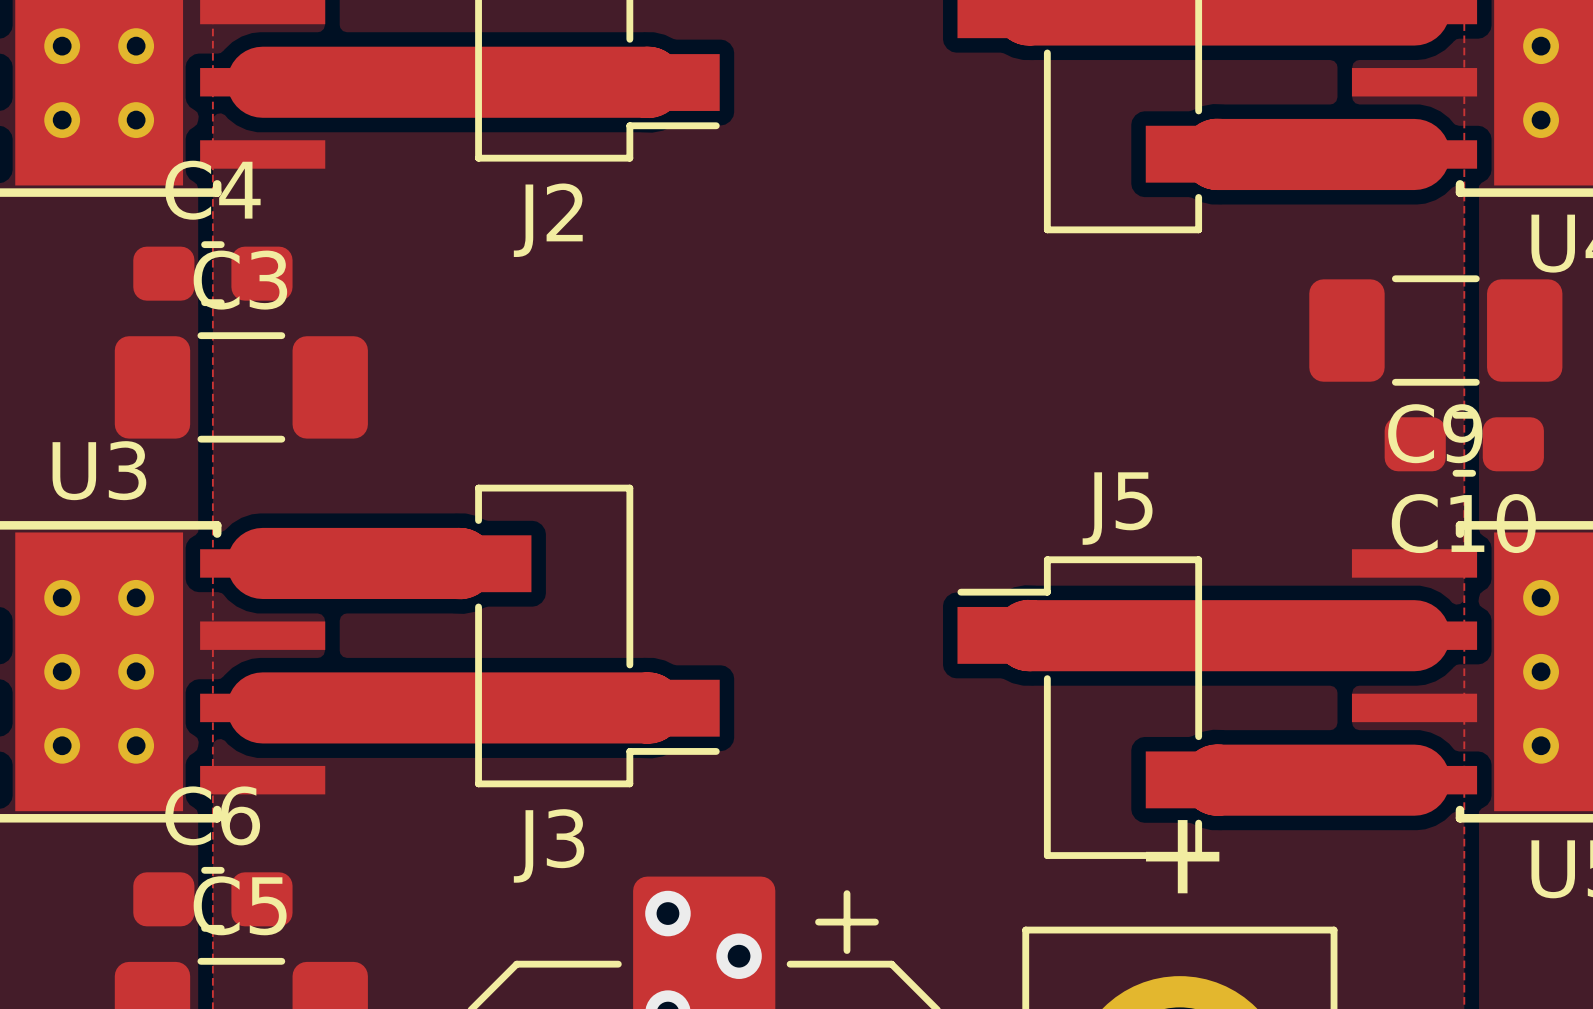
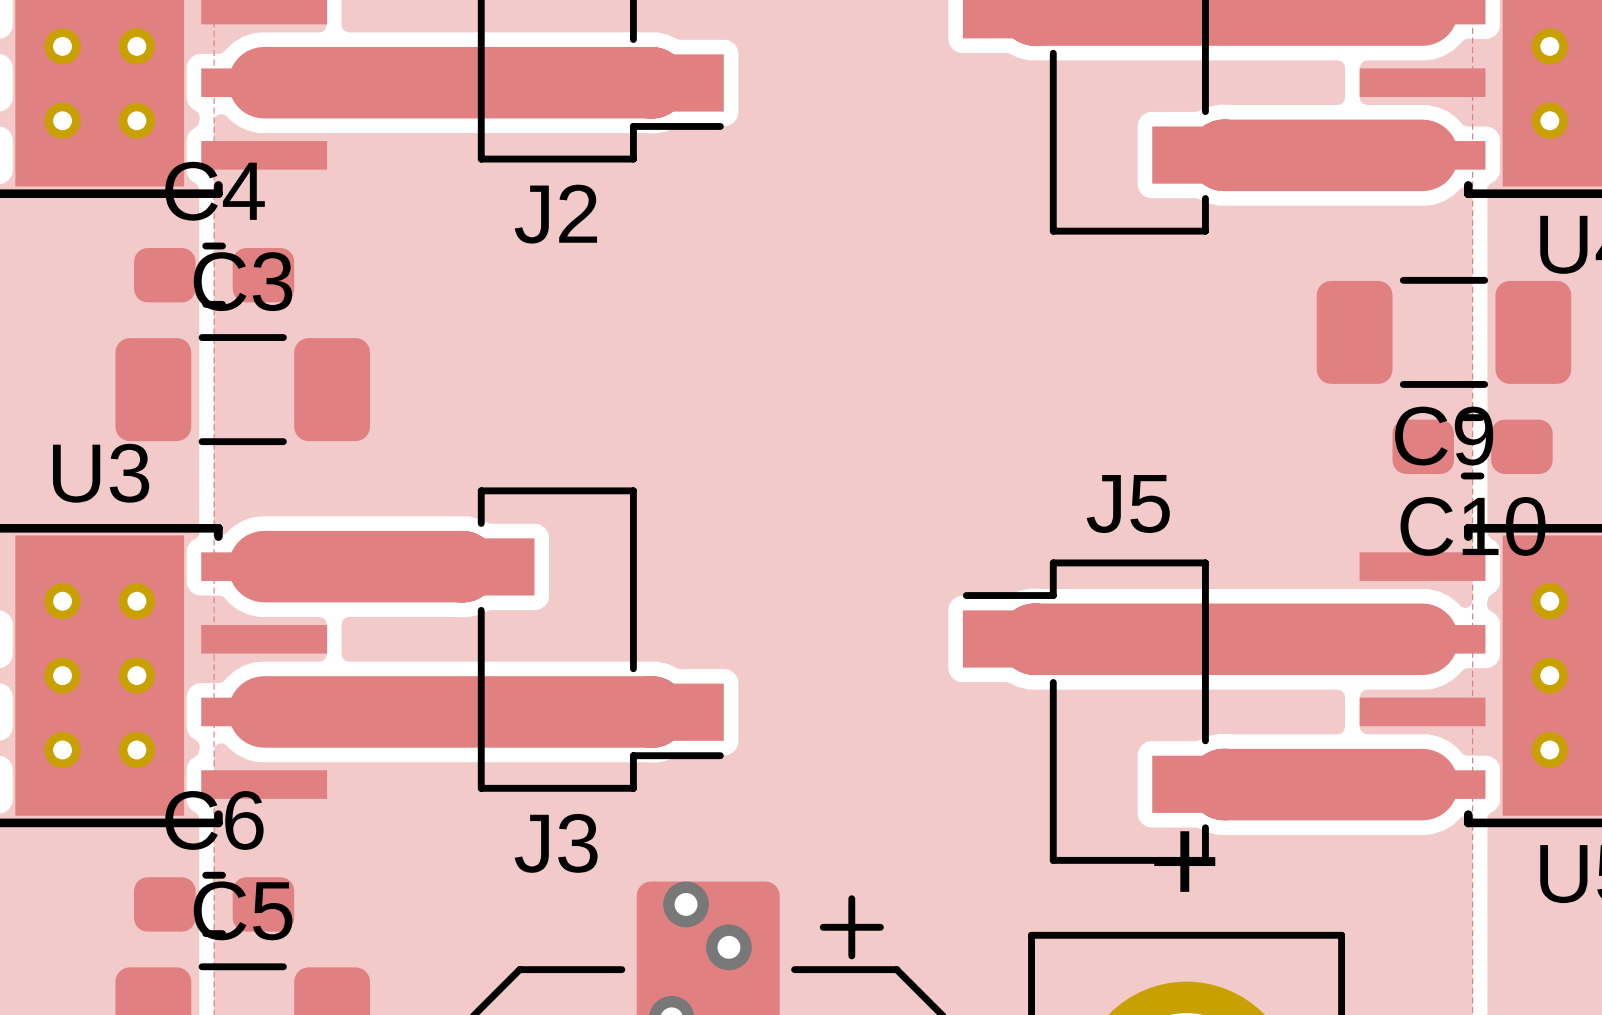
via position: (667, 913) -> (686, 904)
via position: (739, 956) -> (728, 947)

